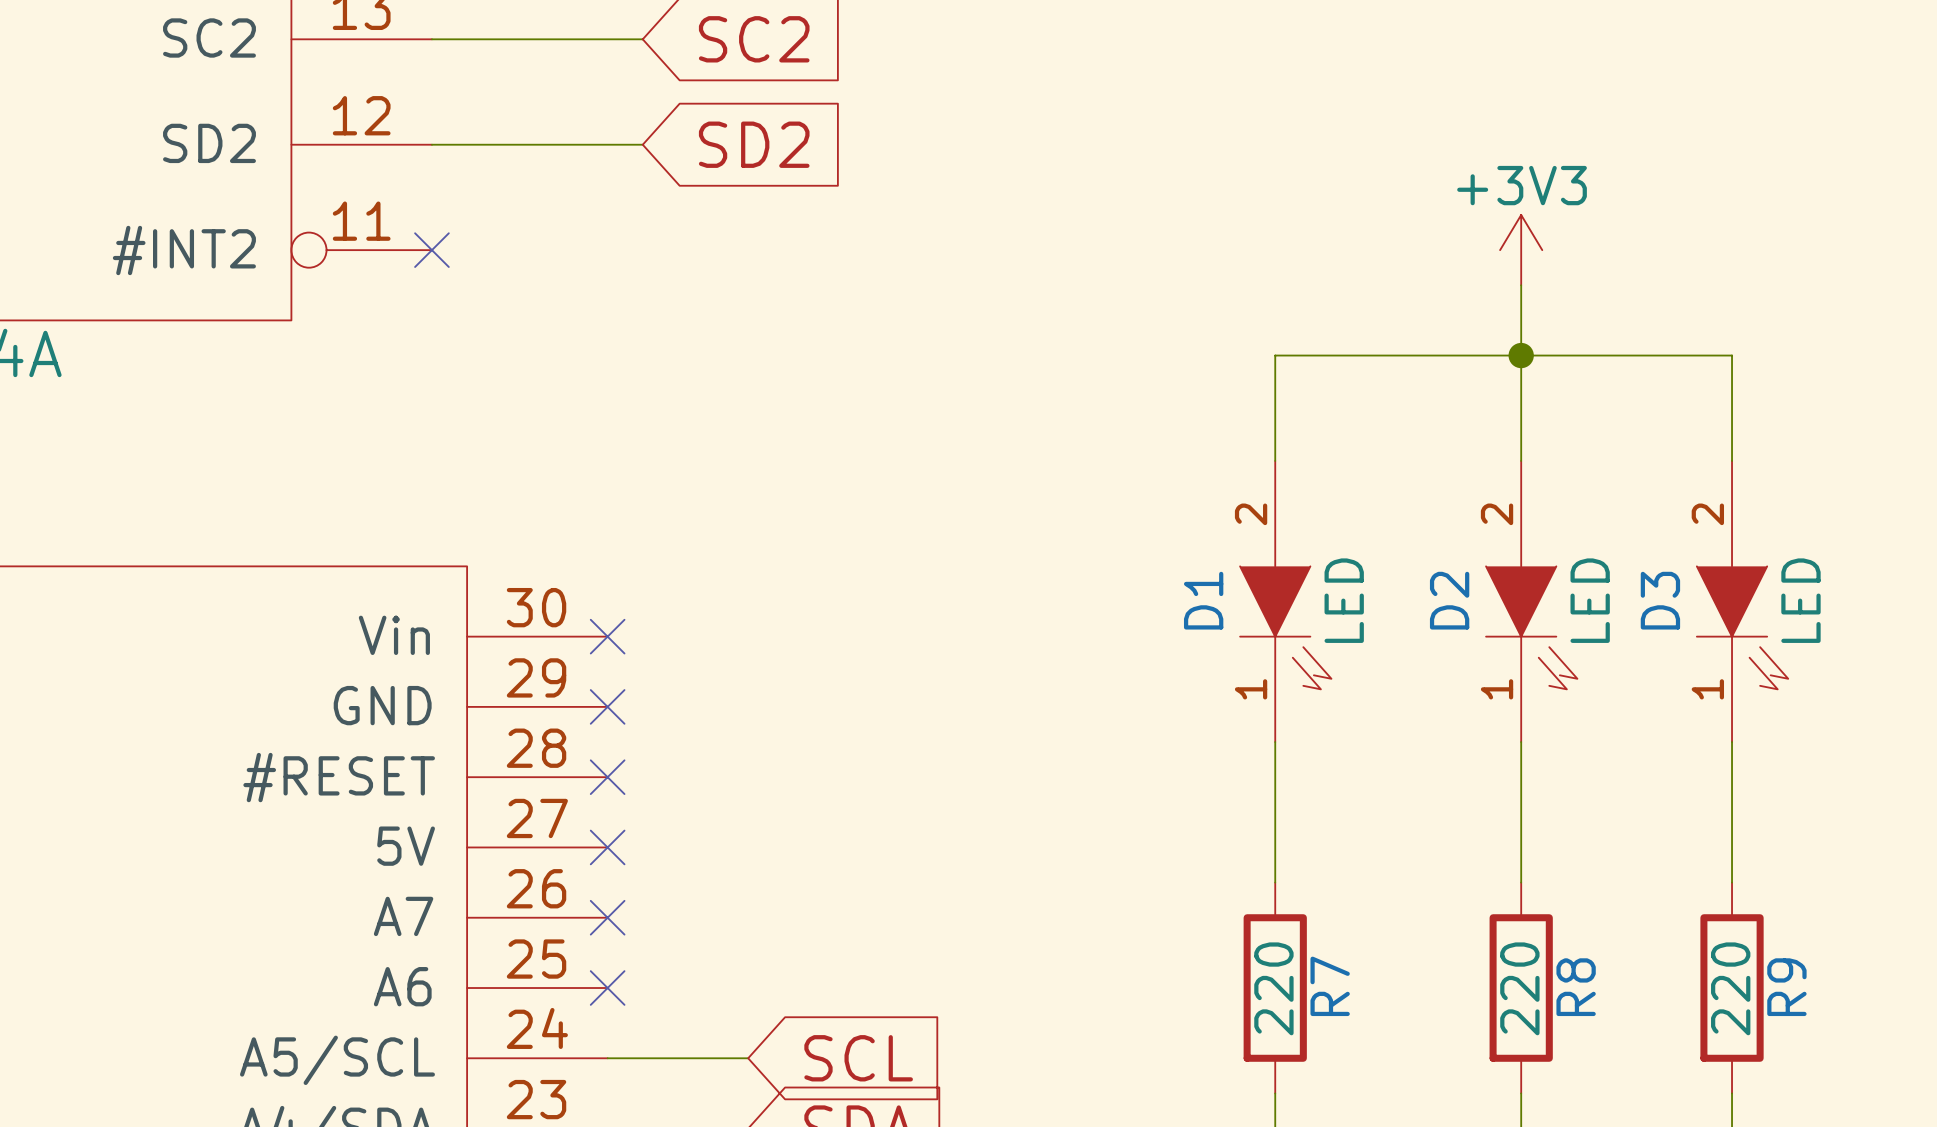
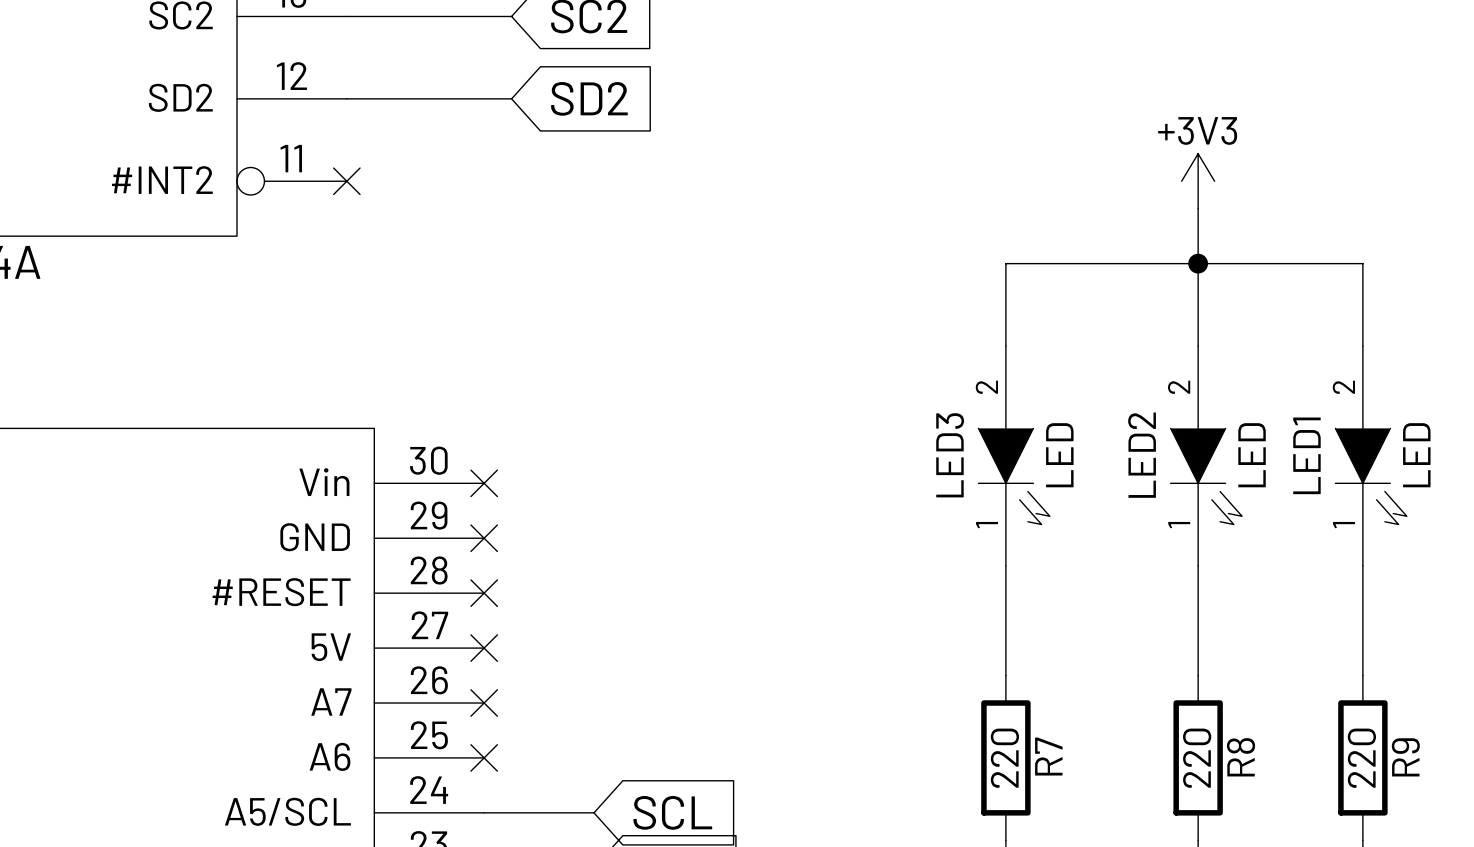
D1 name: D1 (1203, 600) -> LED3 (950, 455)
D2 name: D2 (1449, 600) -> LED2 (1142, 455)
D3 name: D3 (1660, 600) -> LED1 (1306, 455)

